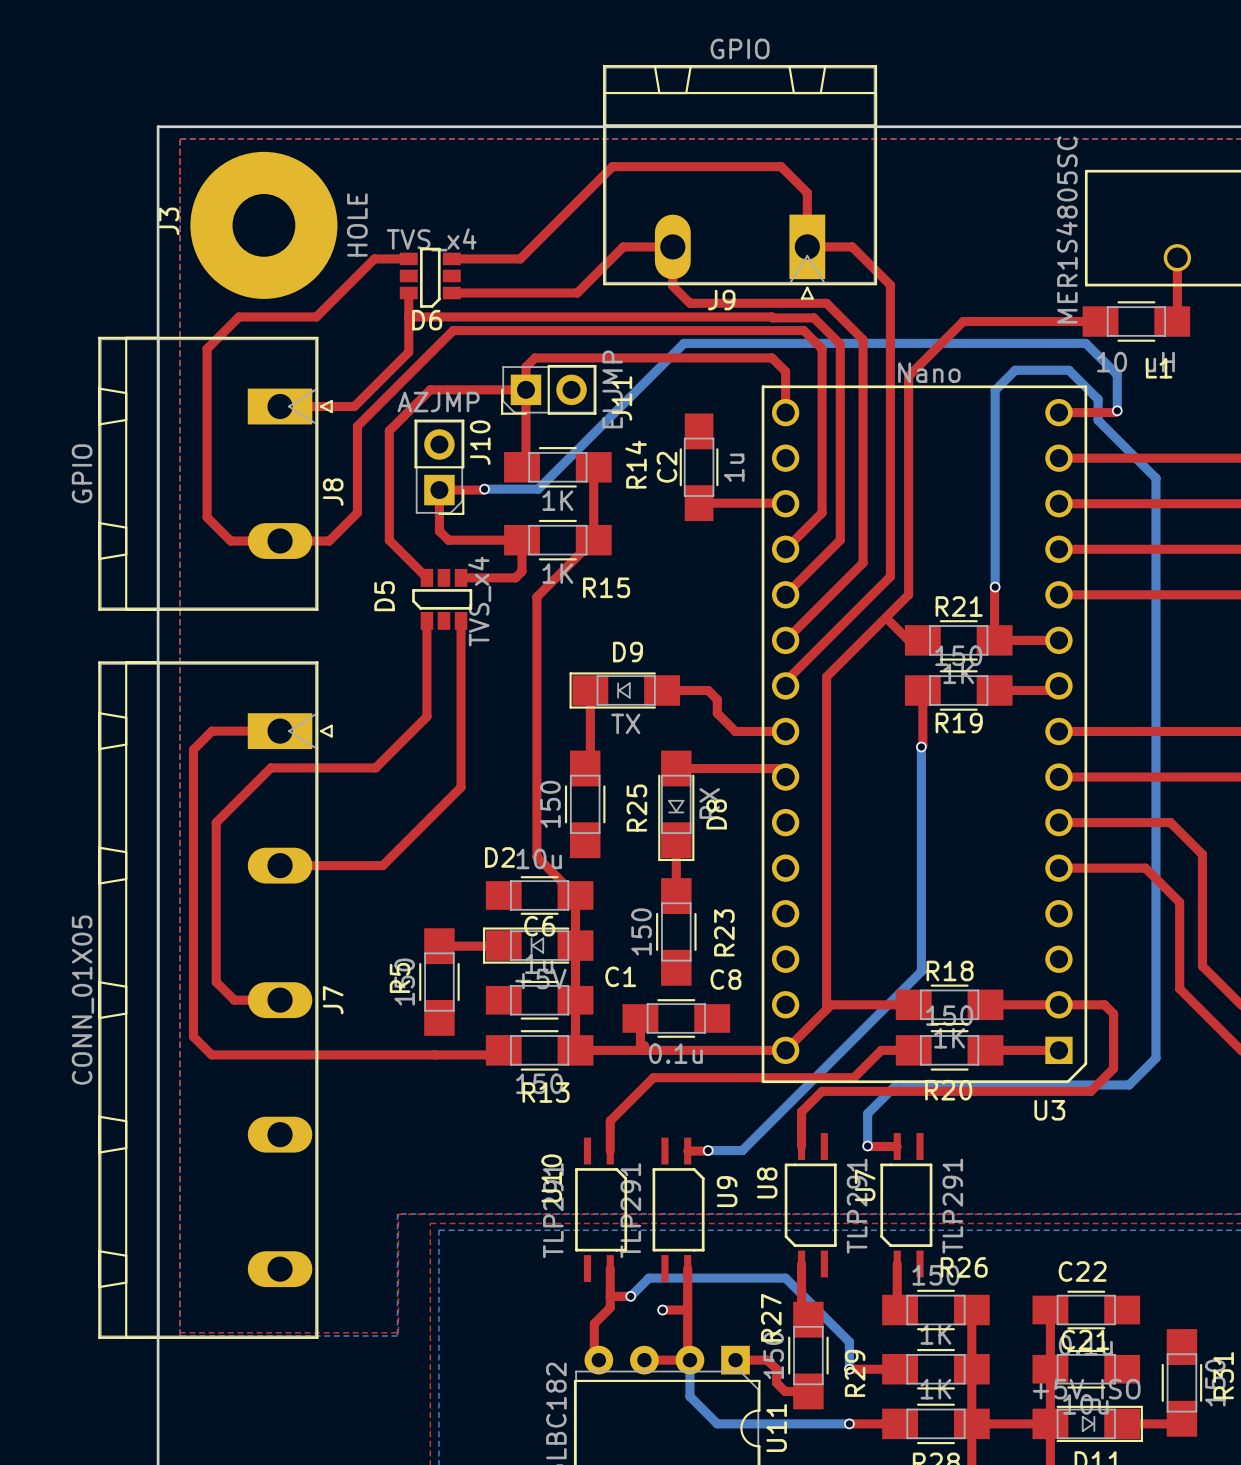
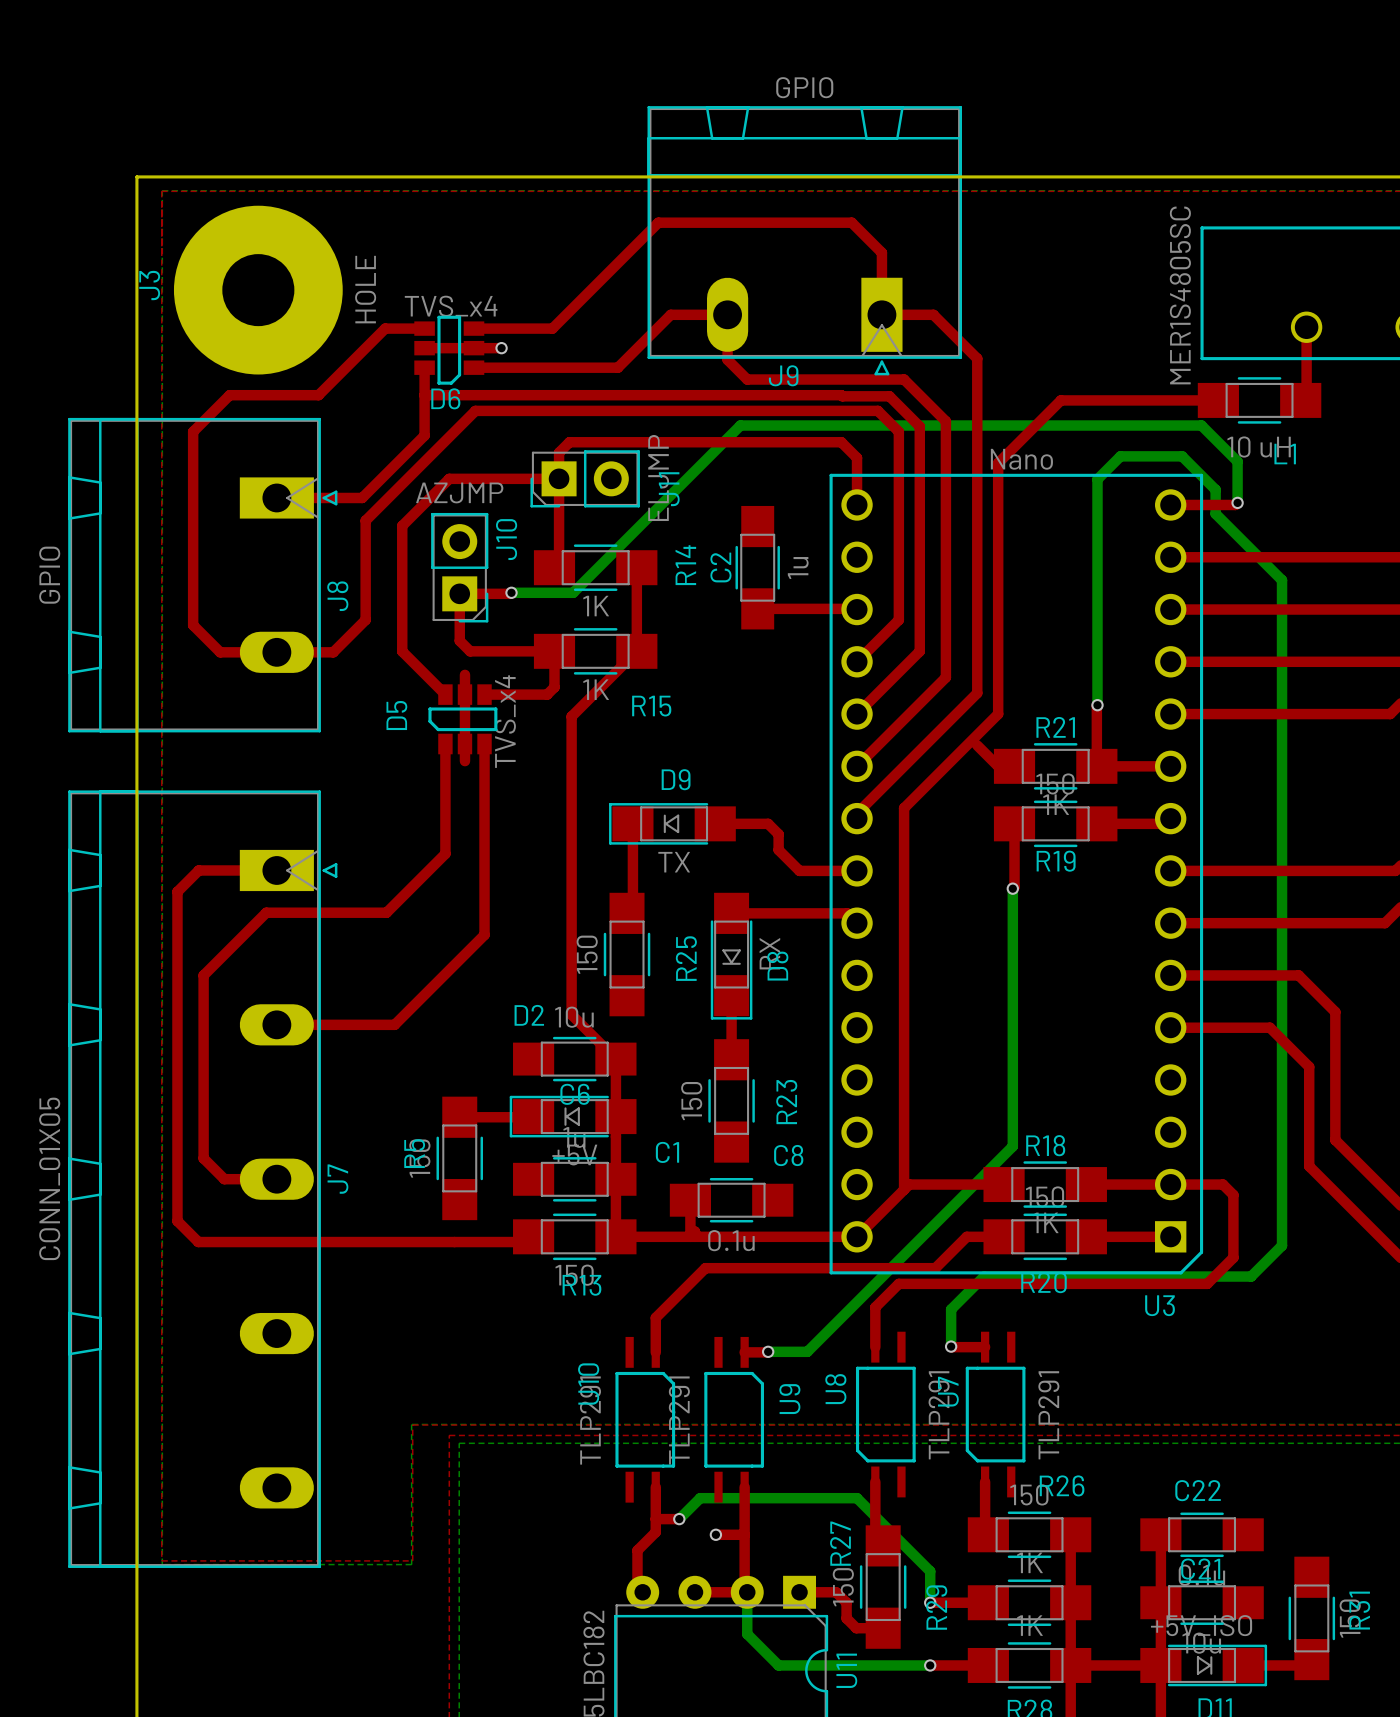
top track: none -> (424, 348) (501, 348)
via: none -> (501, 348)
top track: none -> (464, 674) (464, 761)

